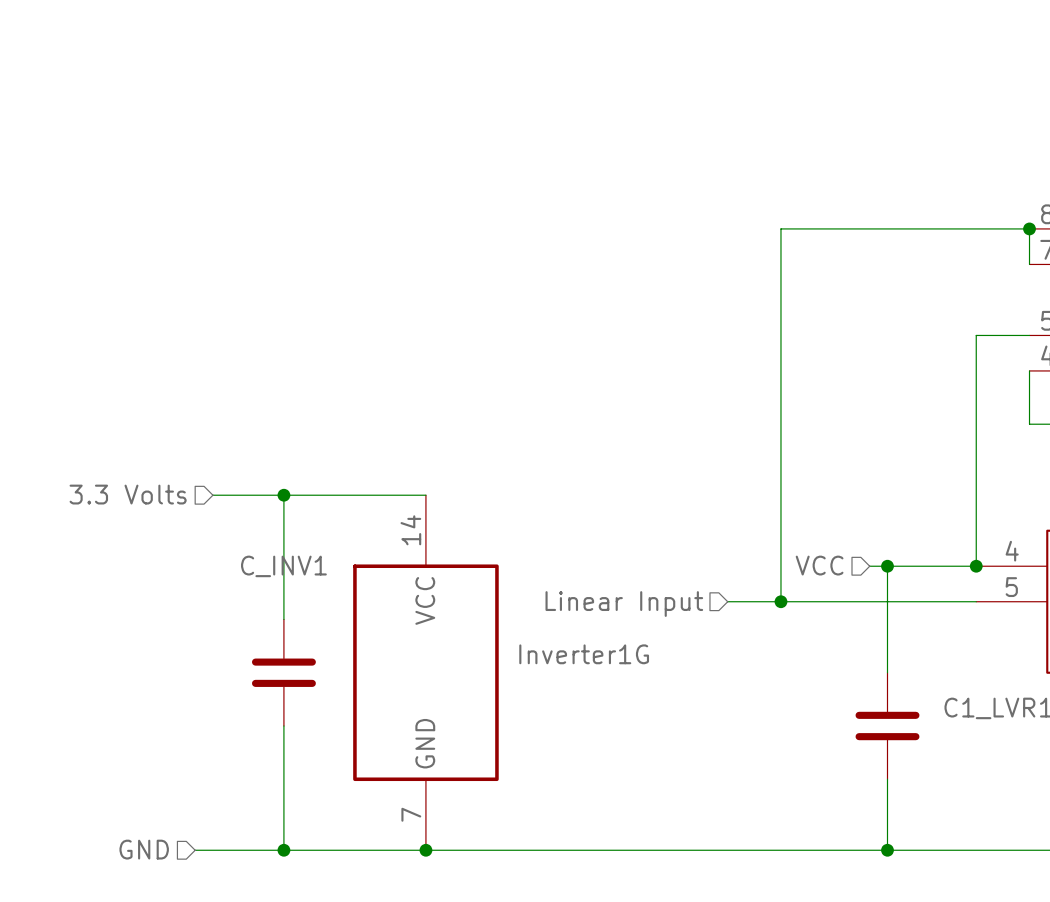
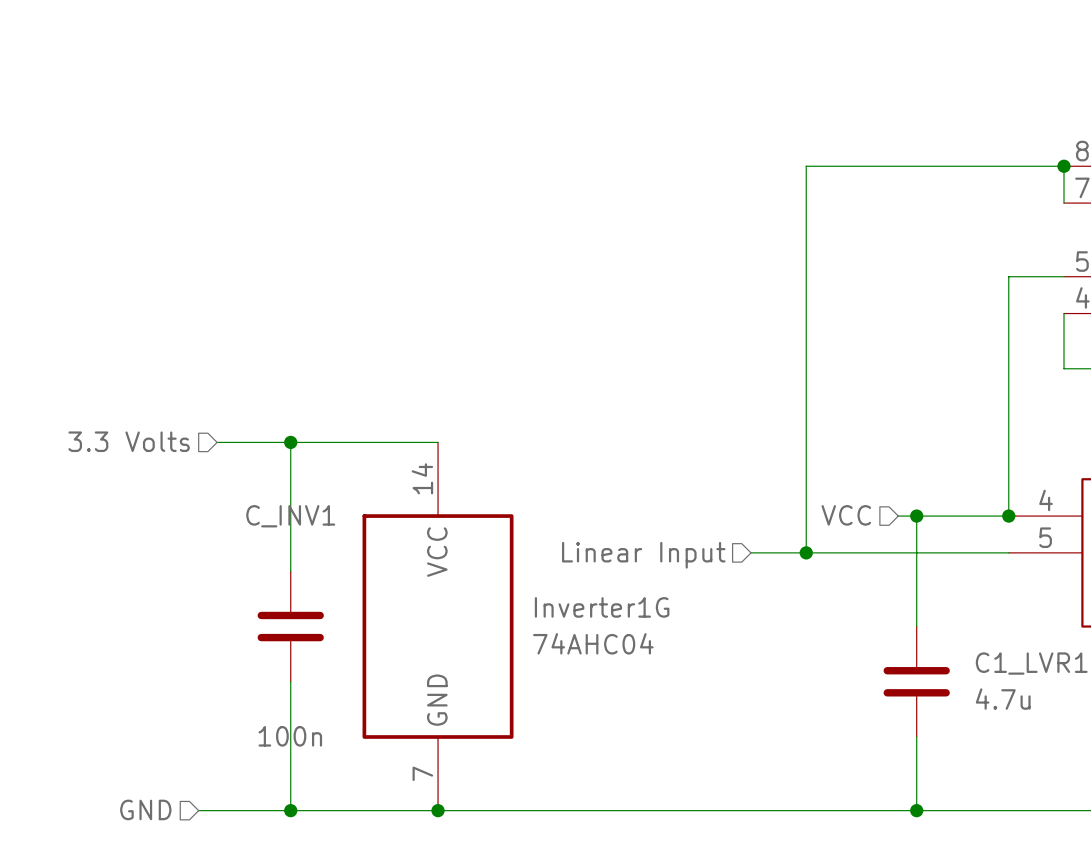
Inverter1G value: none -> 74AHC04 (593, 643)
C1_LVR1 value: none -> 4.7u (1003, 699)
C_INV1 value: none -> 100n (290, 736)

